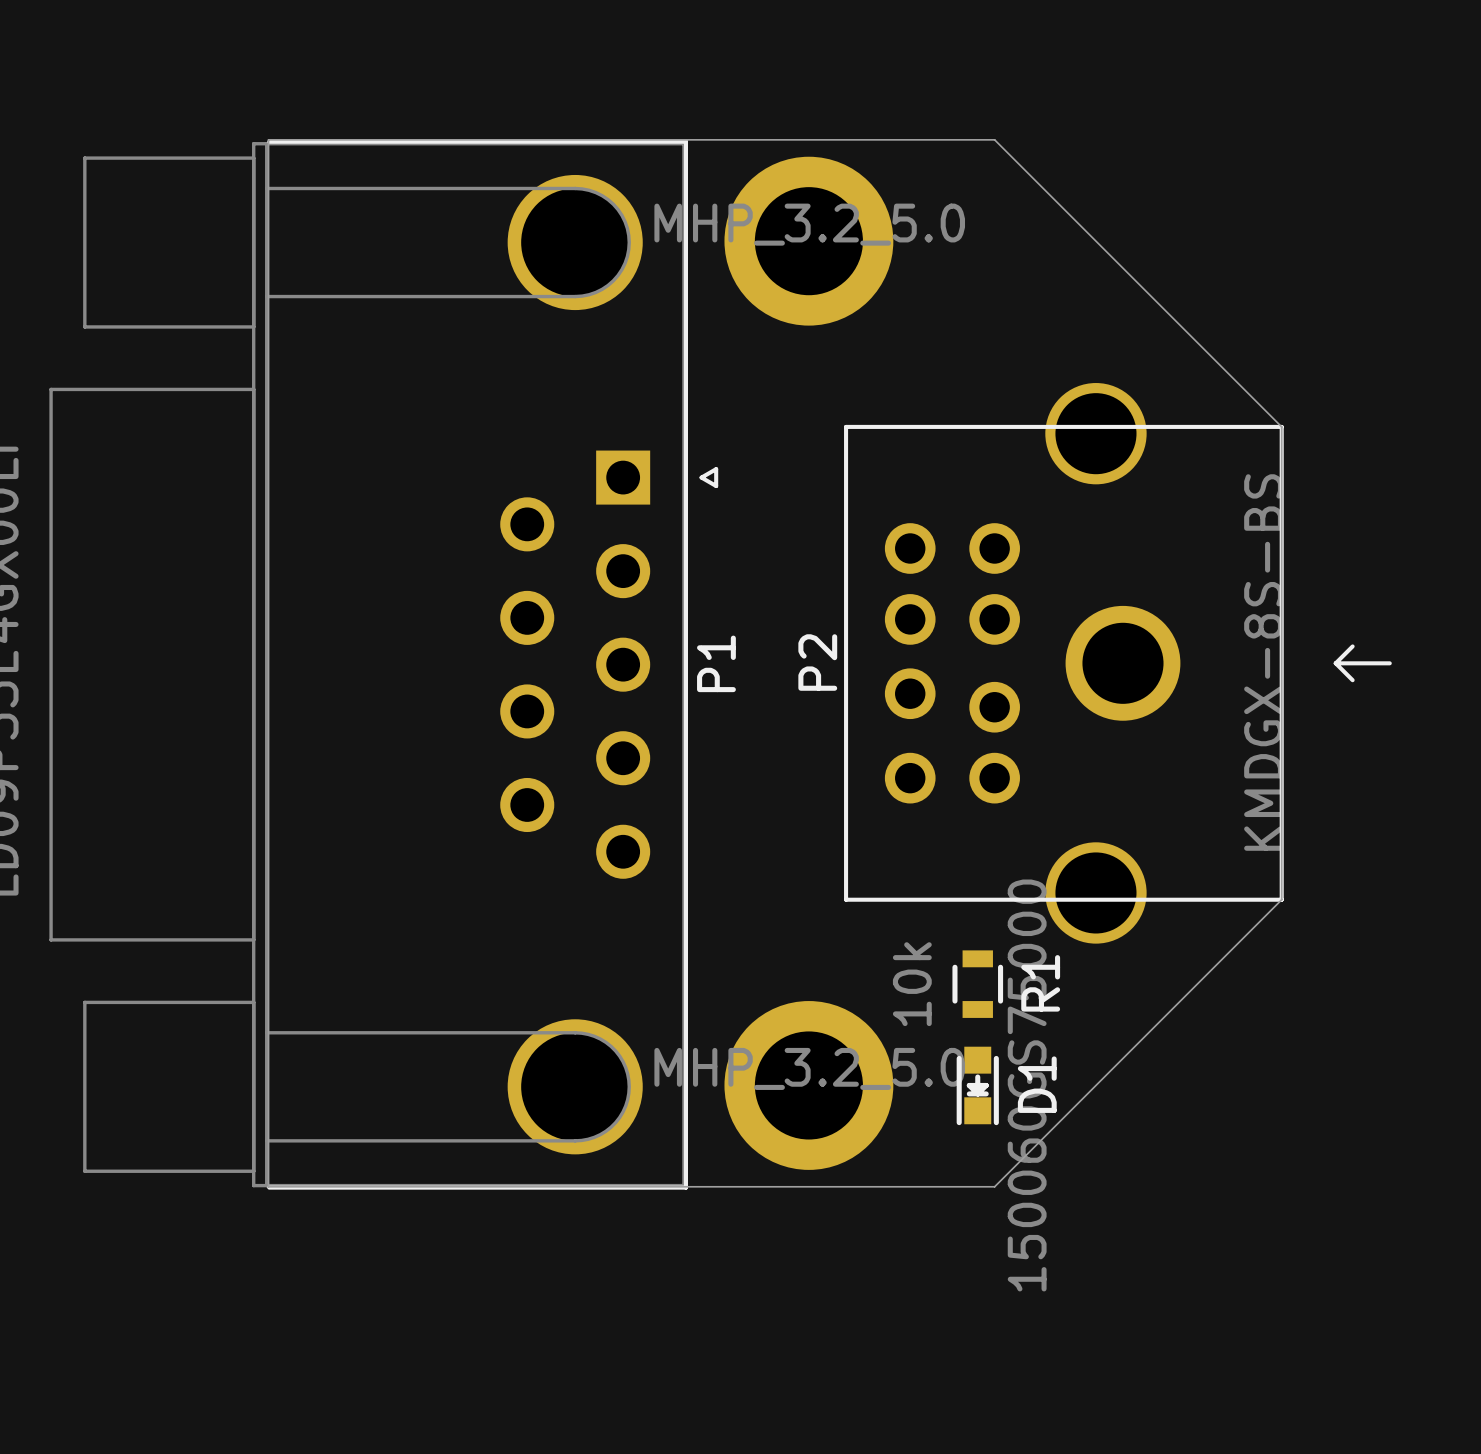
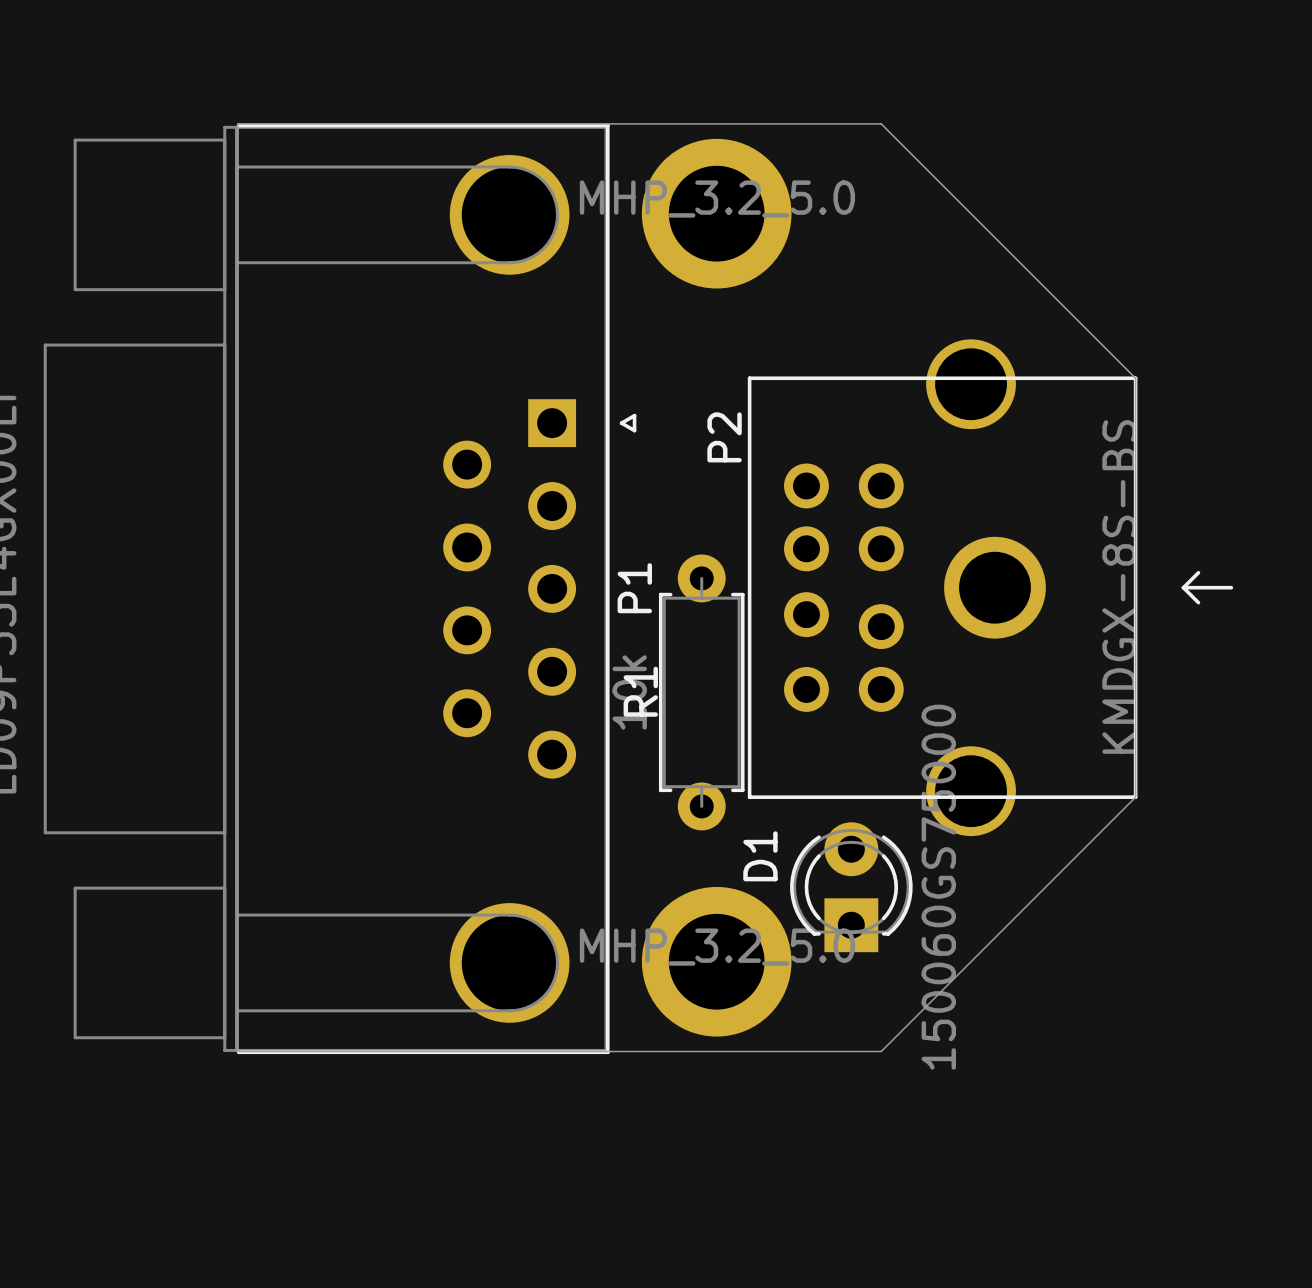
P2 name position: P2 (817, 662) -> P2 (724, 437)
R1 footprint: [952, 950, 1004, 1018] -> [658, 554, 745, 831]
R1 name position: R1 (1040, 983) -> R1 (640, 691)
D1 footprint: [956, 1046, 999, 1126] -> [790, 822, 913, 953]
D1 name position: D1 (1037, 1084) -> D1 (760, 856)

